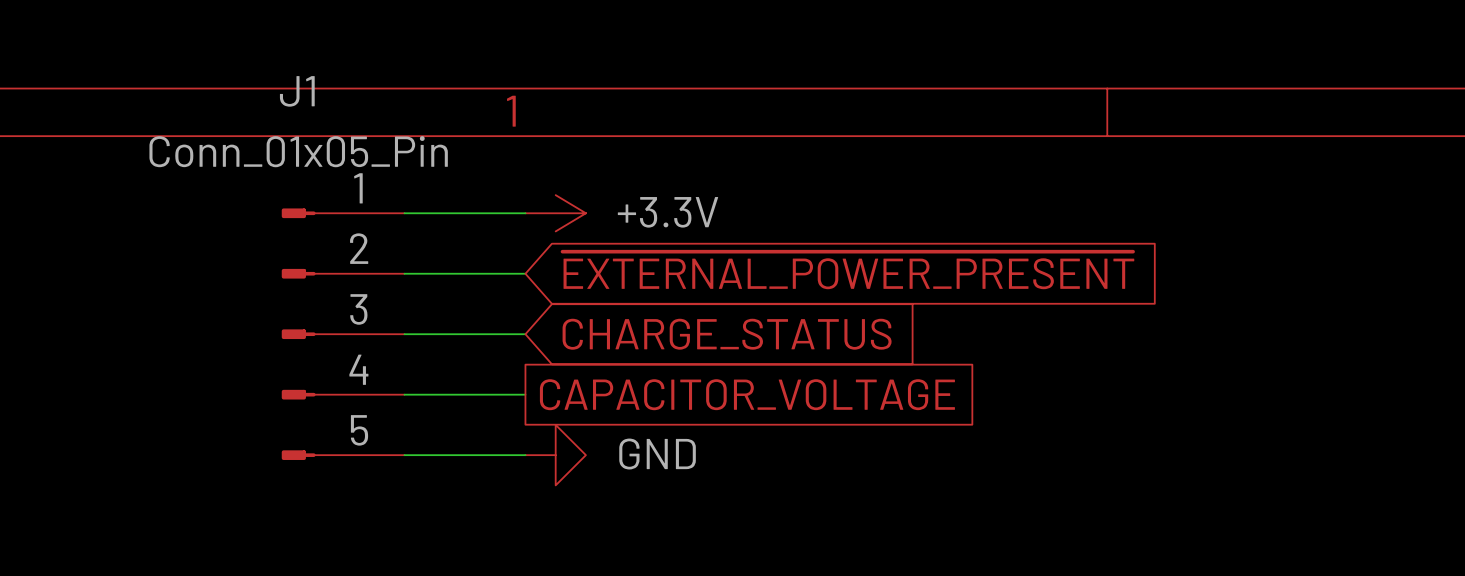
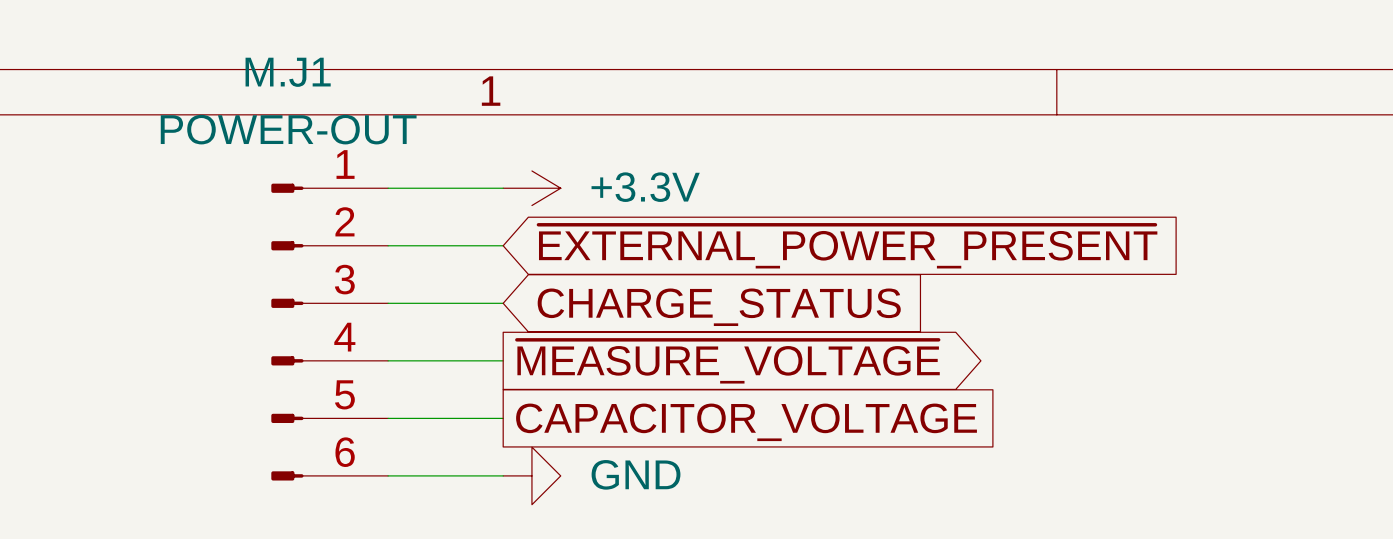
J1: Conn_01x05_Pin (343, 334) -> none
M.J1: none -> POWER-OUT (329, 332)
global label shape: passive (747, 394) -> output (728, 361)
global label: CAPACITOR_VOLTAGE (747, 394) -> ~{MEASURE_VOLTAGE} (728, 361)
power symbol position: GND (555, 455) -> GND (531, 475)
global label: none -> CAPACITOR_VOLTAGE (746, 422)
wire: none -> (388, 475) (503, 475)

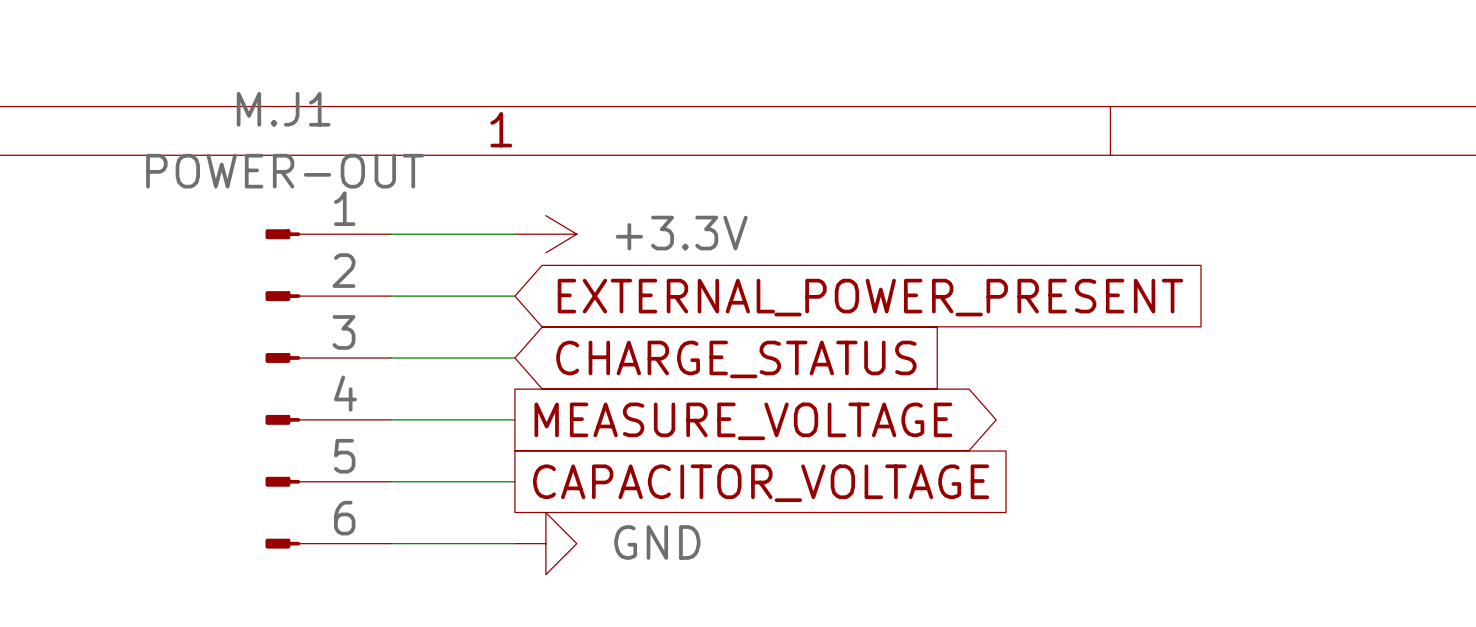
global label: ~{EXTERNAL_POWER_PRESENT} (847, 246) -> EXTERNAL_POWER_PRESENT (870, 297)
global label: ~{MEASURE_VOLTAGE} (728, 361) -> MEASURE_VOLTAGE (743, 421)

